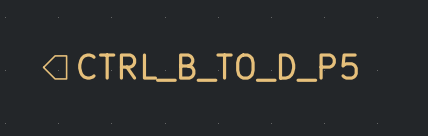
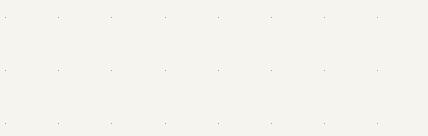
hierarchical label: CTRL_B_TO_D_P5 (217, 67) -> none

